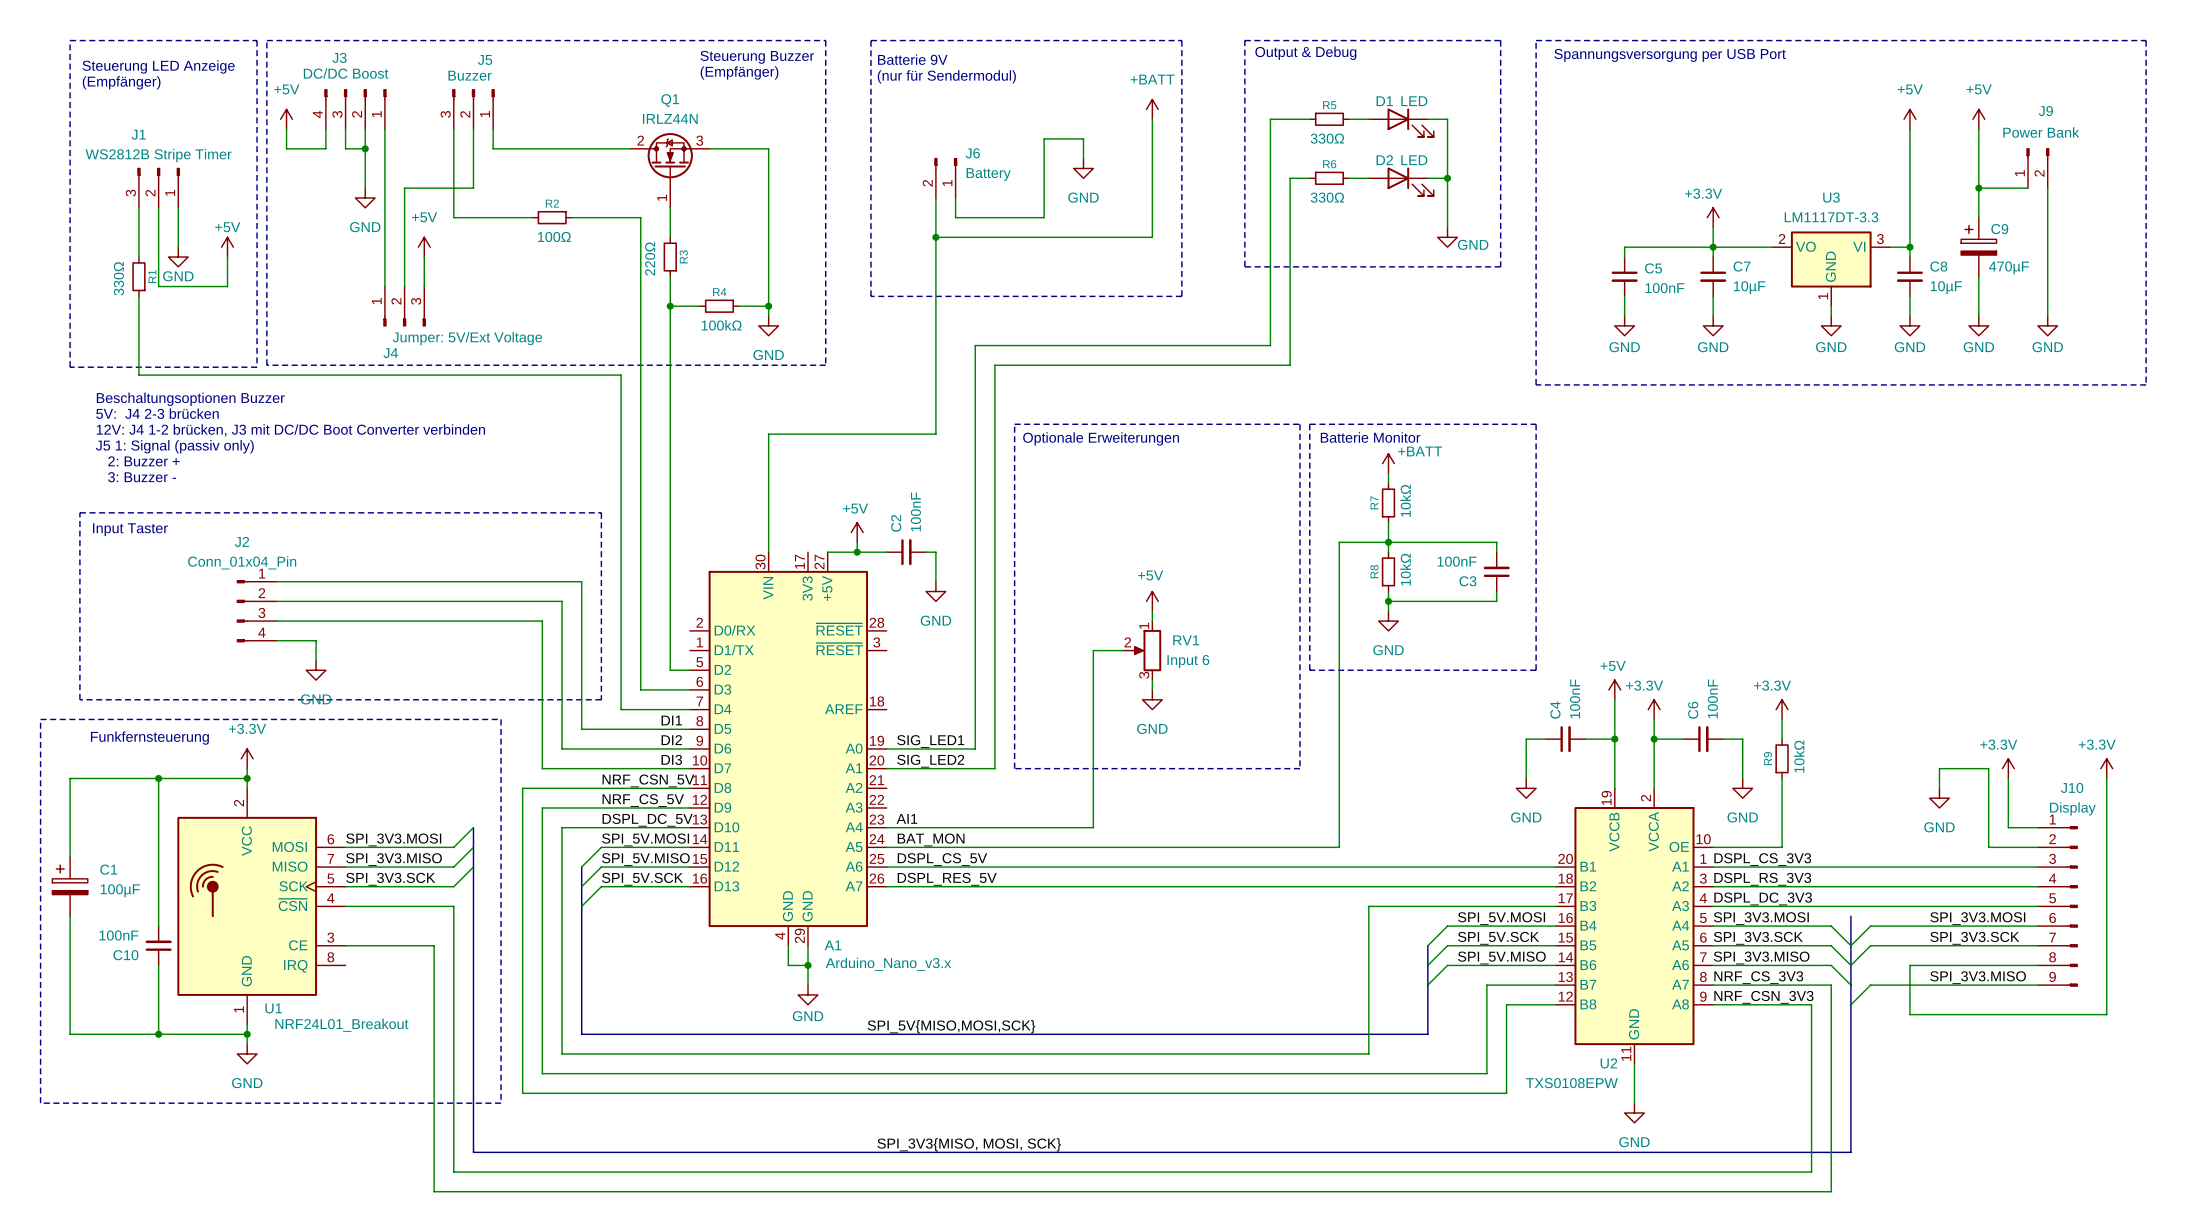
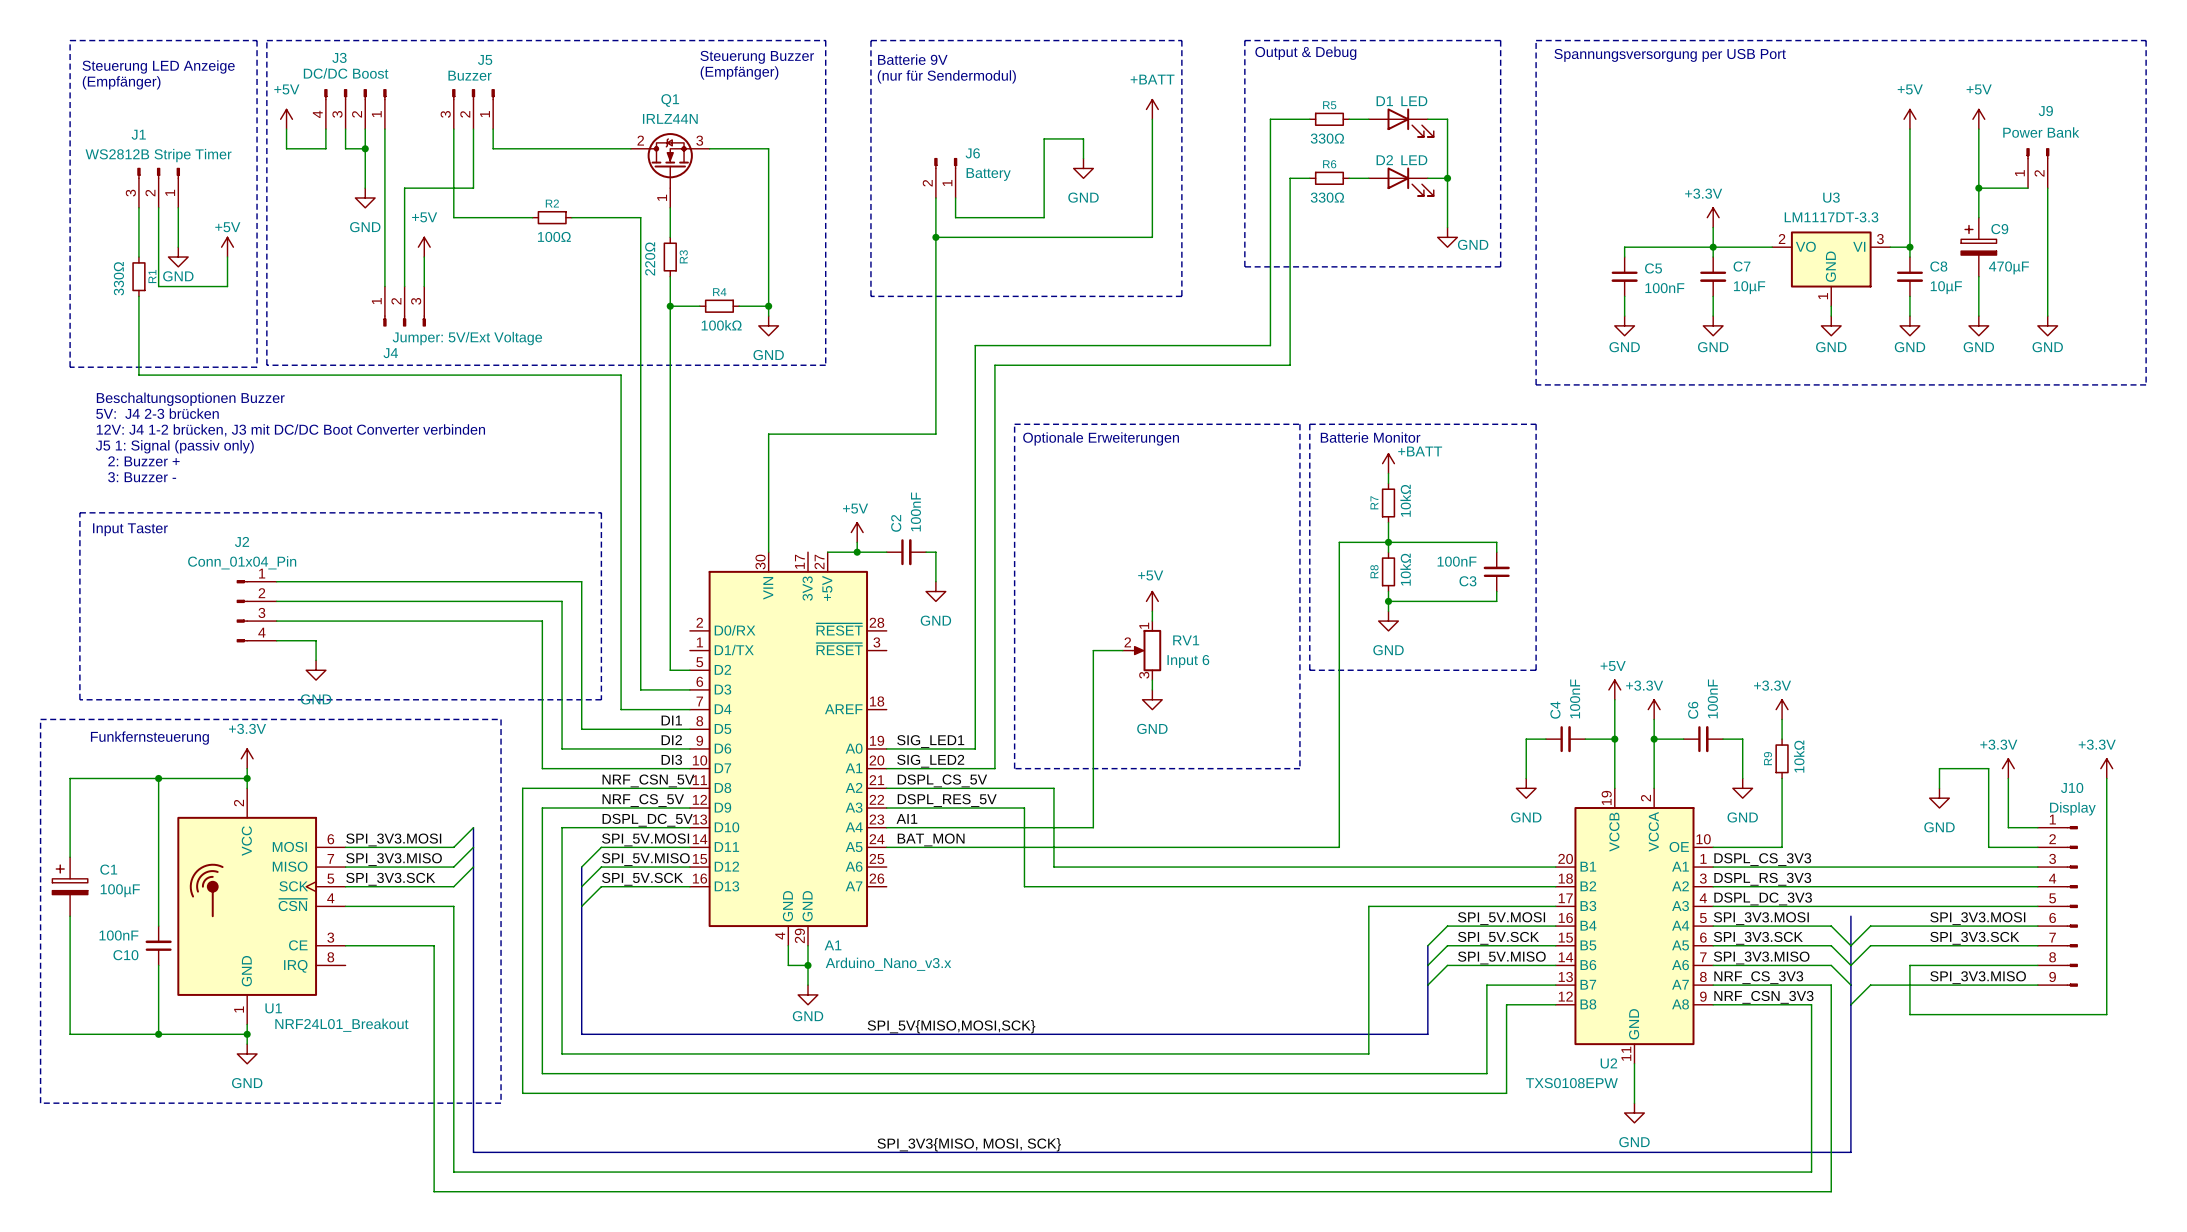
label position: DSPL_CS_5V (942, 859) -> DSPL_CS_5V (942, 780)
wire: (886, 867) (1053, 867) -> (886, 788) (1053, 788) (1053, 867)
label position: DSPL_RES_5V (947, 879) -> DSPL_RES_5V (947, 800)
wire: (886, 886) (1024, 886) -> (886, 808) (1024, 808) (1024, 886)

